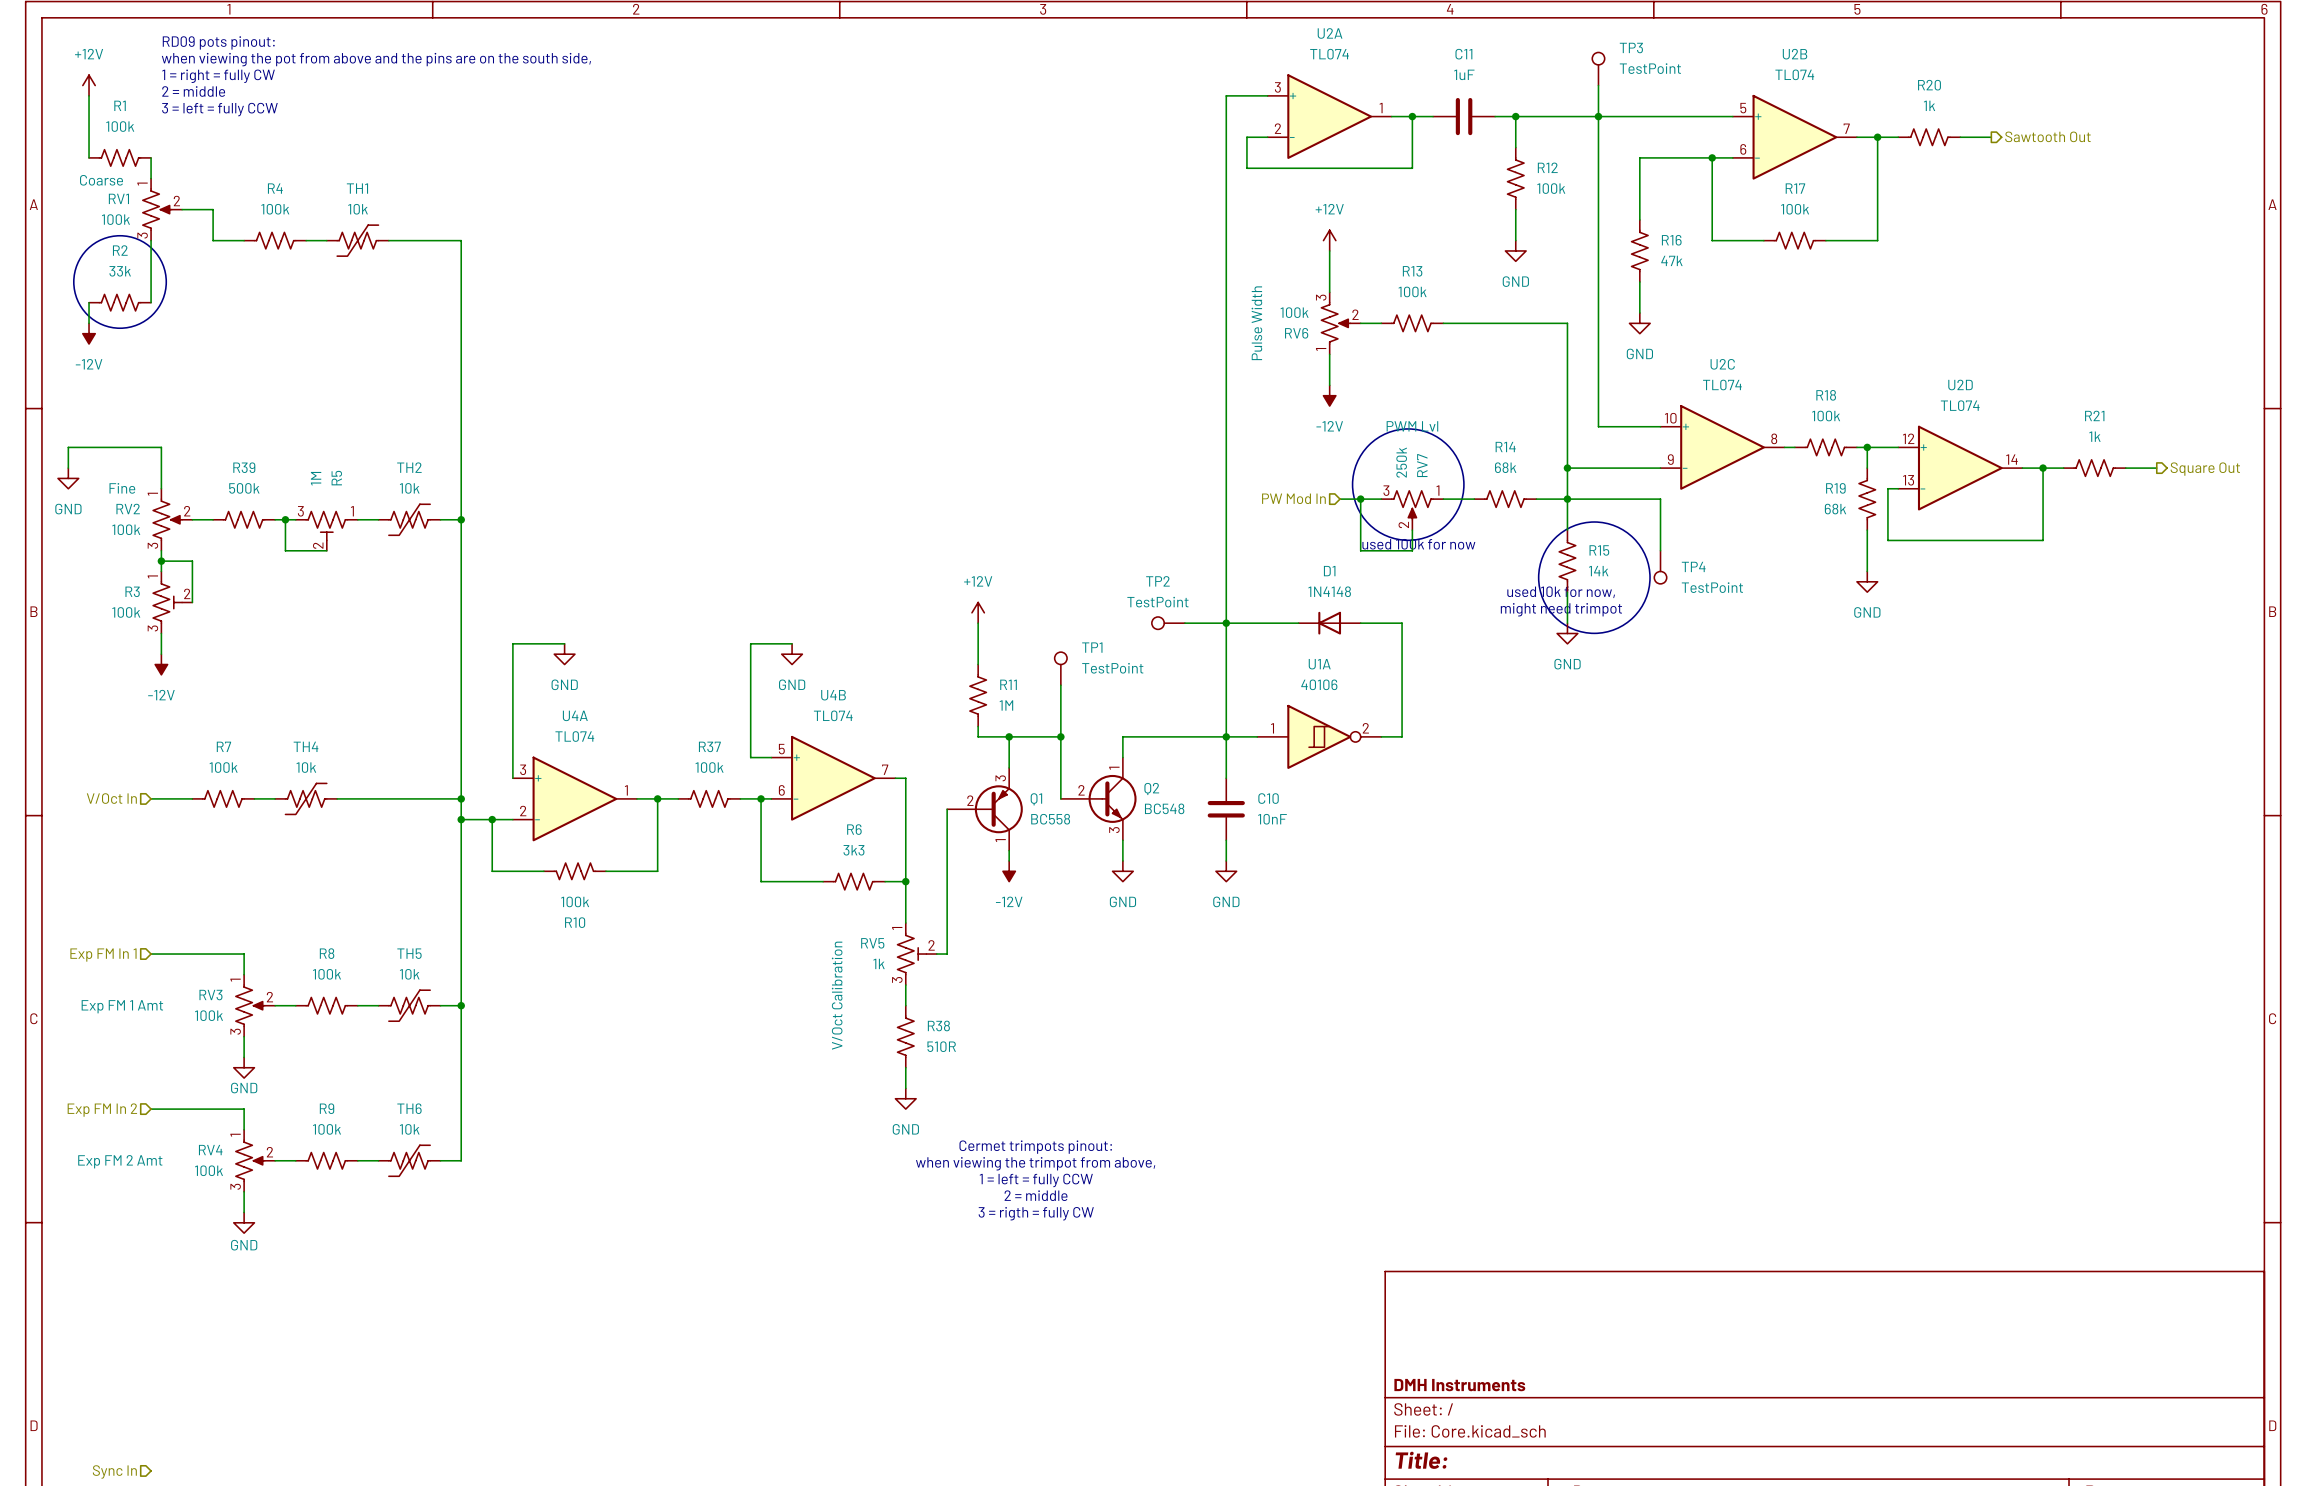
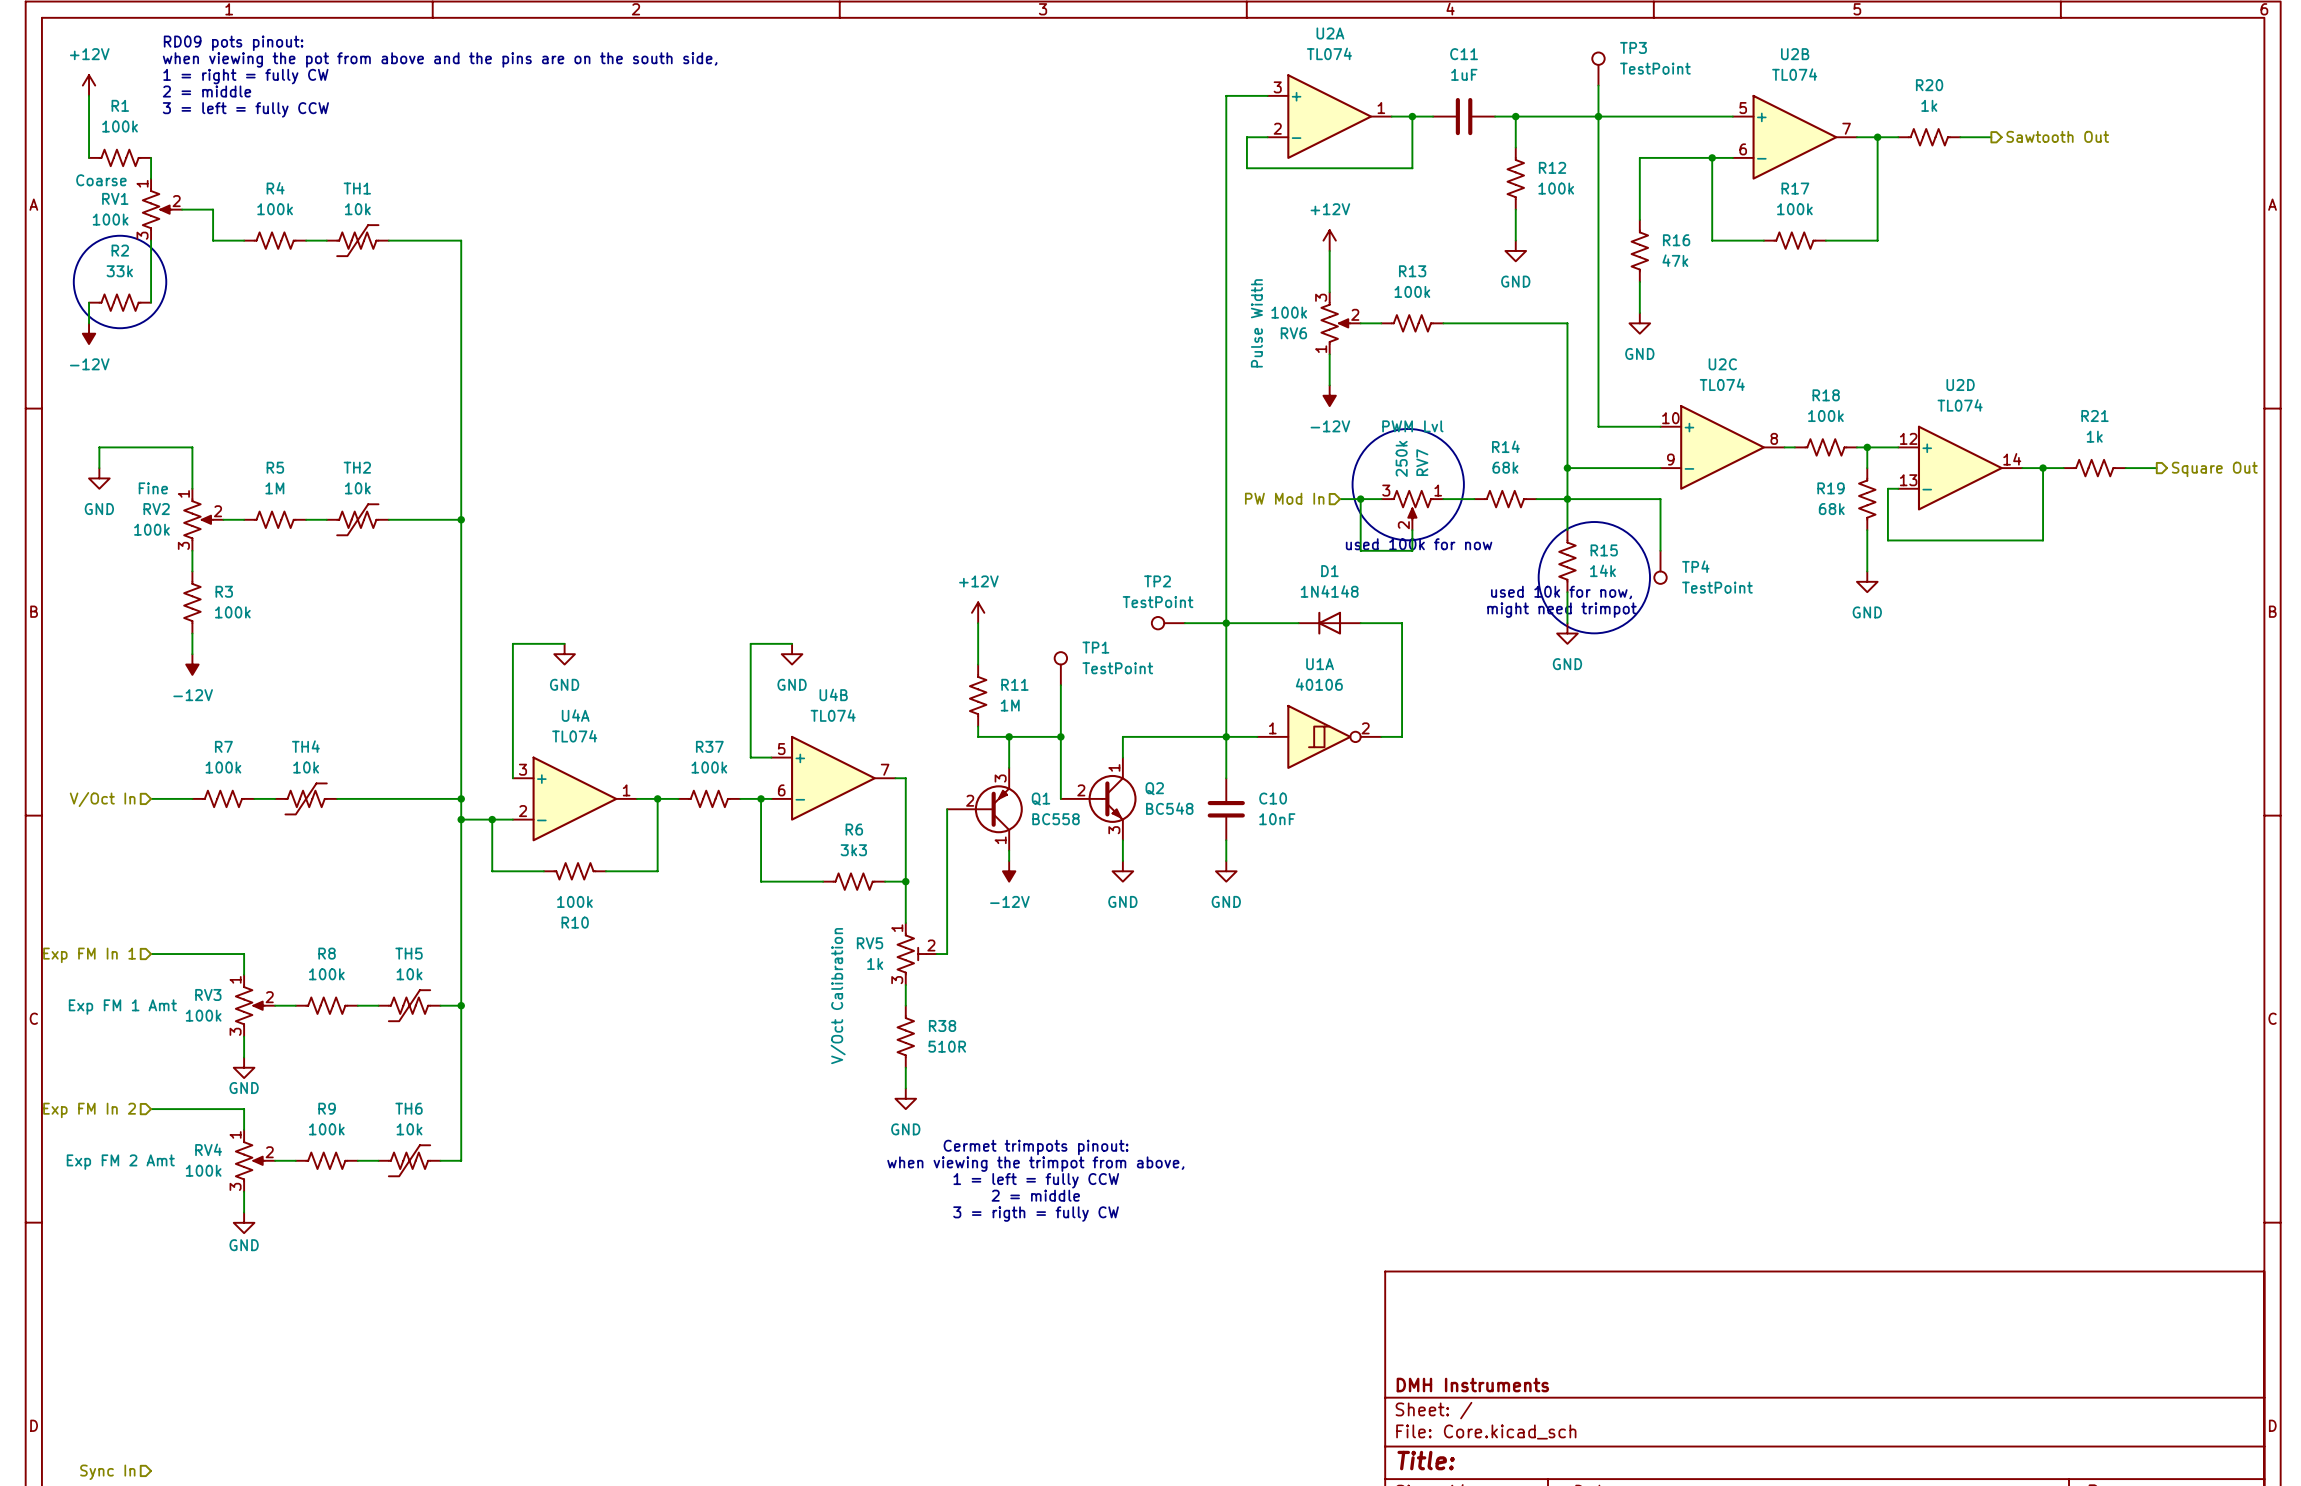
wire: (99, 447) (68, 447) (68, 468) -> (99, 447) (99, 468)
wire: (161, 447) (161, 488) -> (161, 447) (192, 447) (192, 488)
power symbol position: GND (68, 478) -> GND (99, 478)
R5 value position: 1M (316, 478) -> 1M (274, 488)
R5 symbol: [295, 511, 358, 551] -> [244, 511, 307, 529]
RV2 position: (172, 519) -> (203, 519)
R39: 500k (244, 519) -> none
wire: (275, 519) (295, 519) -> (306, 519) (326, 519)
wire: (285, 519) (285, 550) (326, 550) -> none
junction: (285, 519) -> none
wire: (357, 519) (378, 519) -> none
TH2 position: (409, 519) -> (357, 519)
wire: (161, 550) (161, 571) -> none
wire: (161, 561) (192, 561) -> (192, 550) (192, 561)
junction: (161, 561) -> none
R3 symbol: [153, 571, 193, 634] -> [184, 571, 201, 634]
R3 name position: R3 (132, 591) -> R3 (224, 591)
R3 value position: 100k (126, 612) -> 100k (232, 612)
wire: (161, 633) (161, 654) -> (192, 633) (192, 654)
power symbol position: -12V (161, 664) -> -12V (192, 664)

